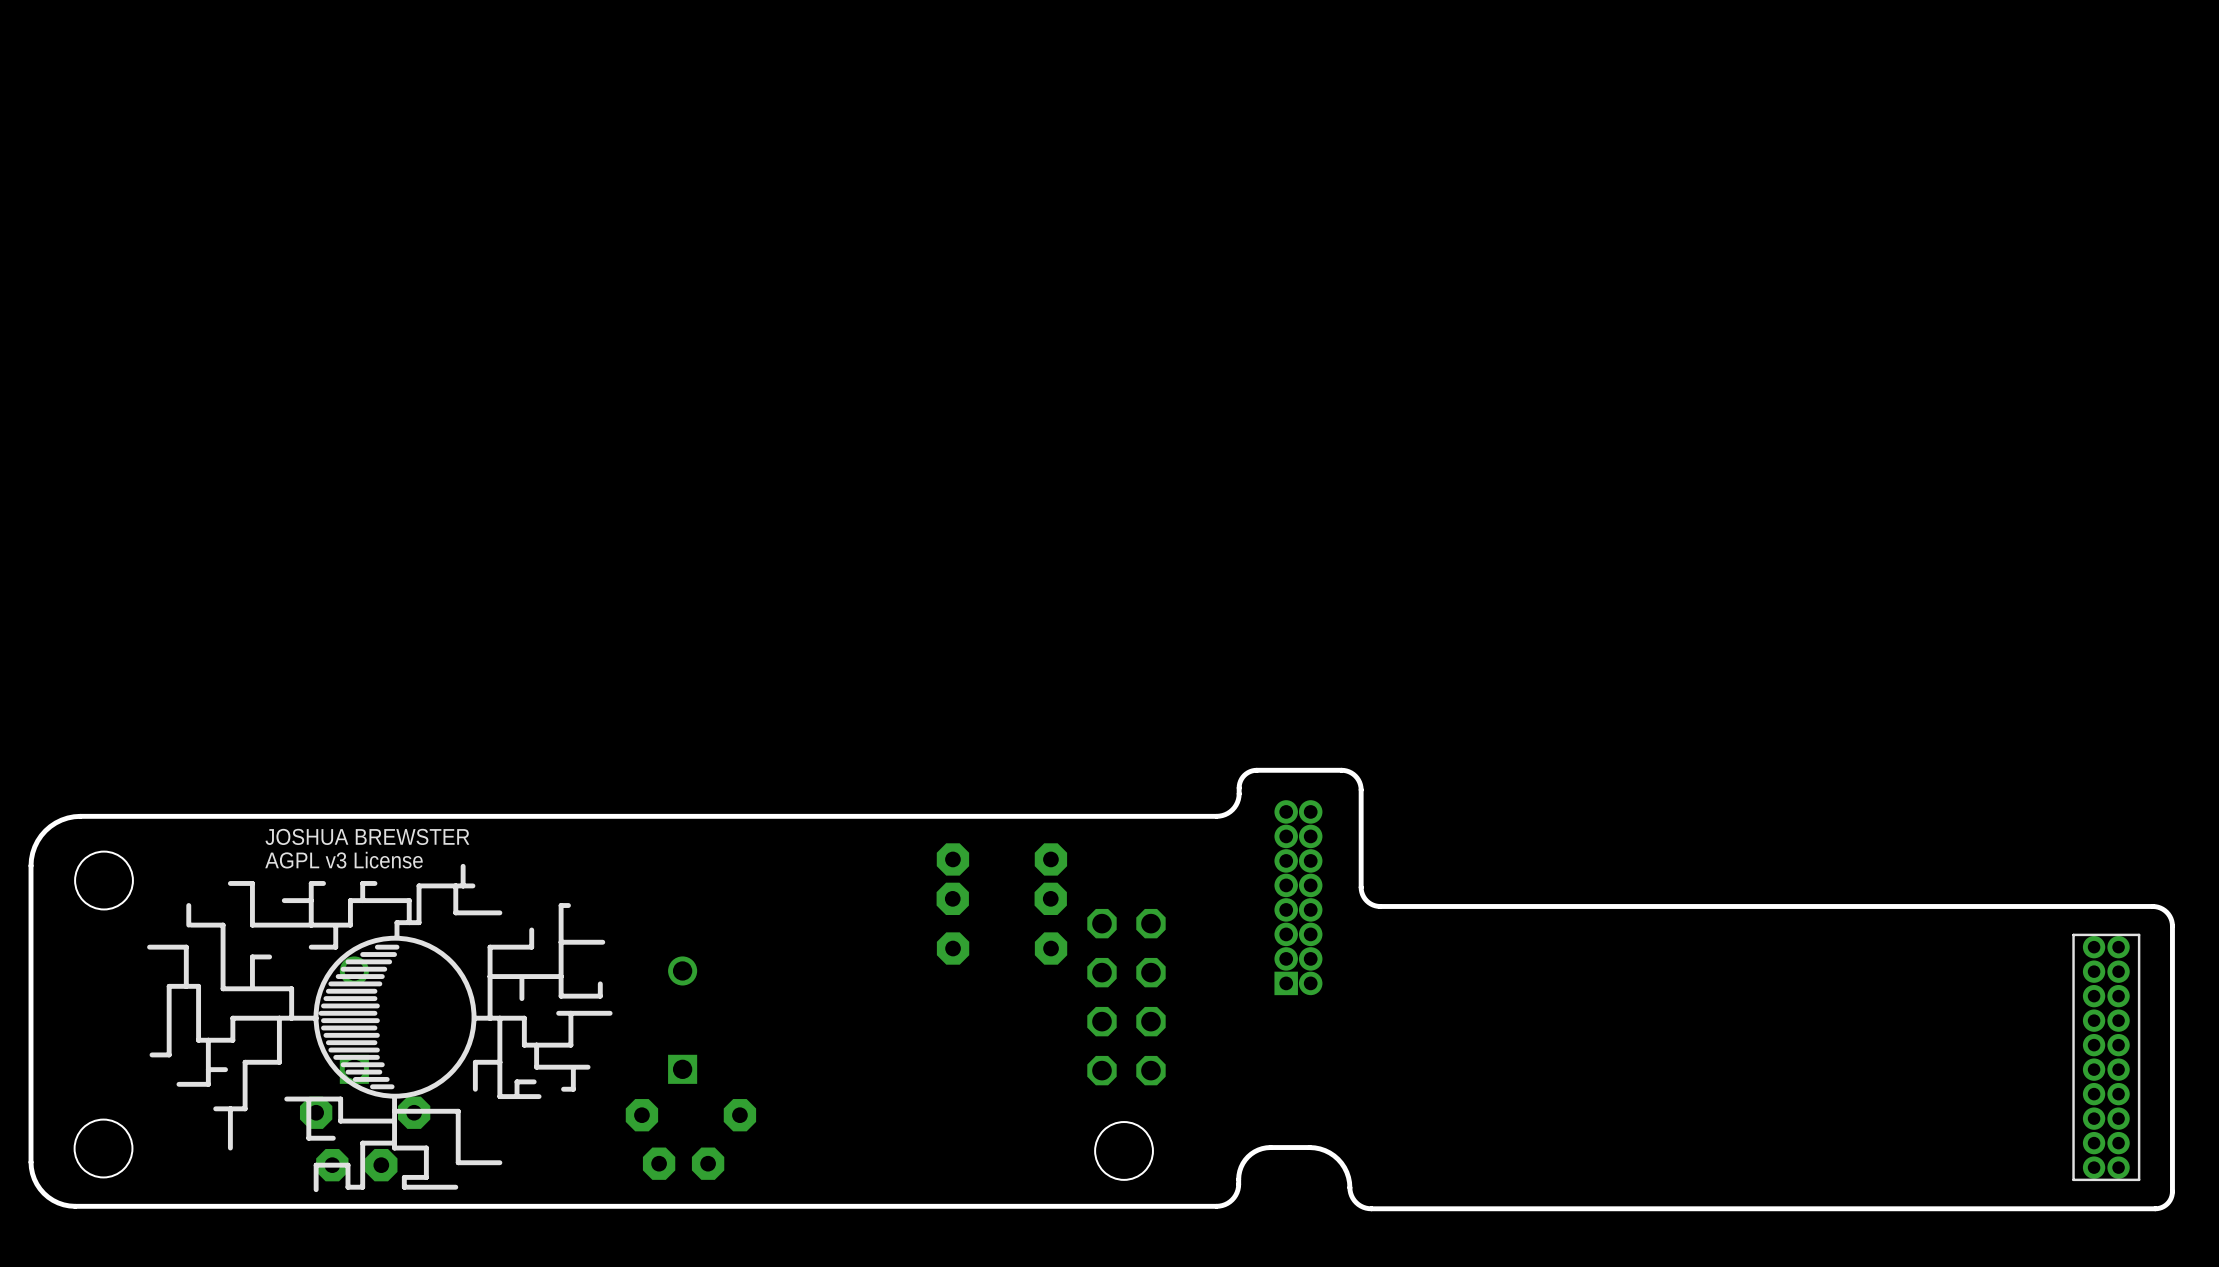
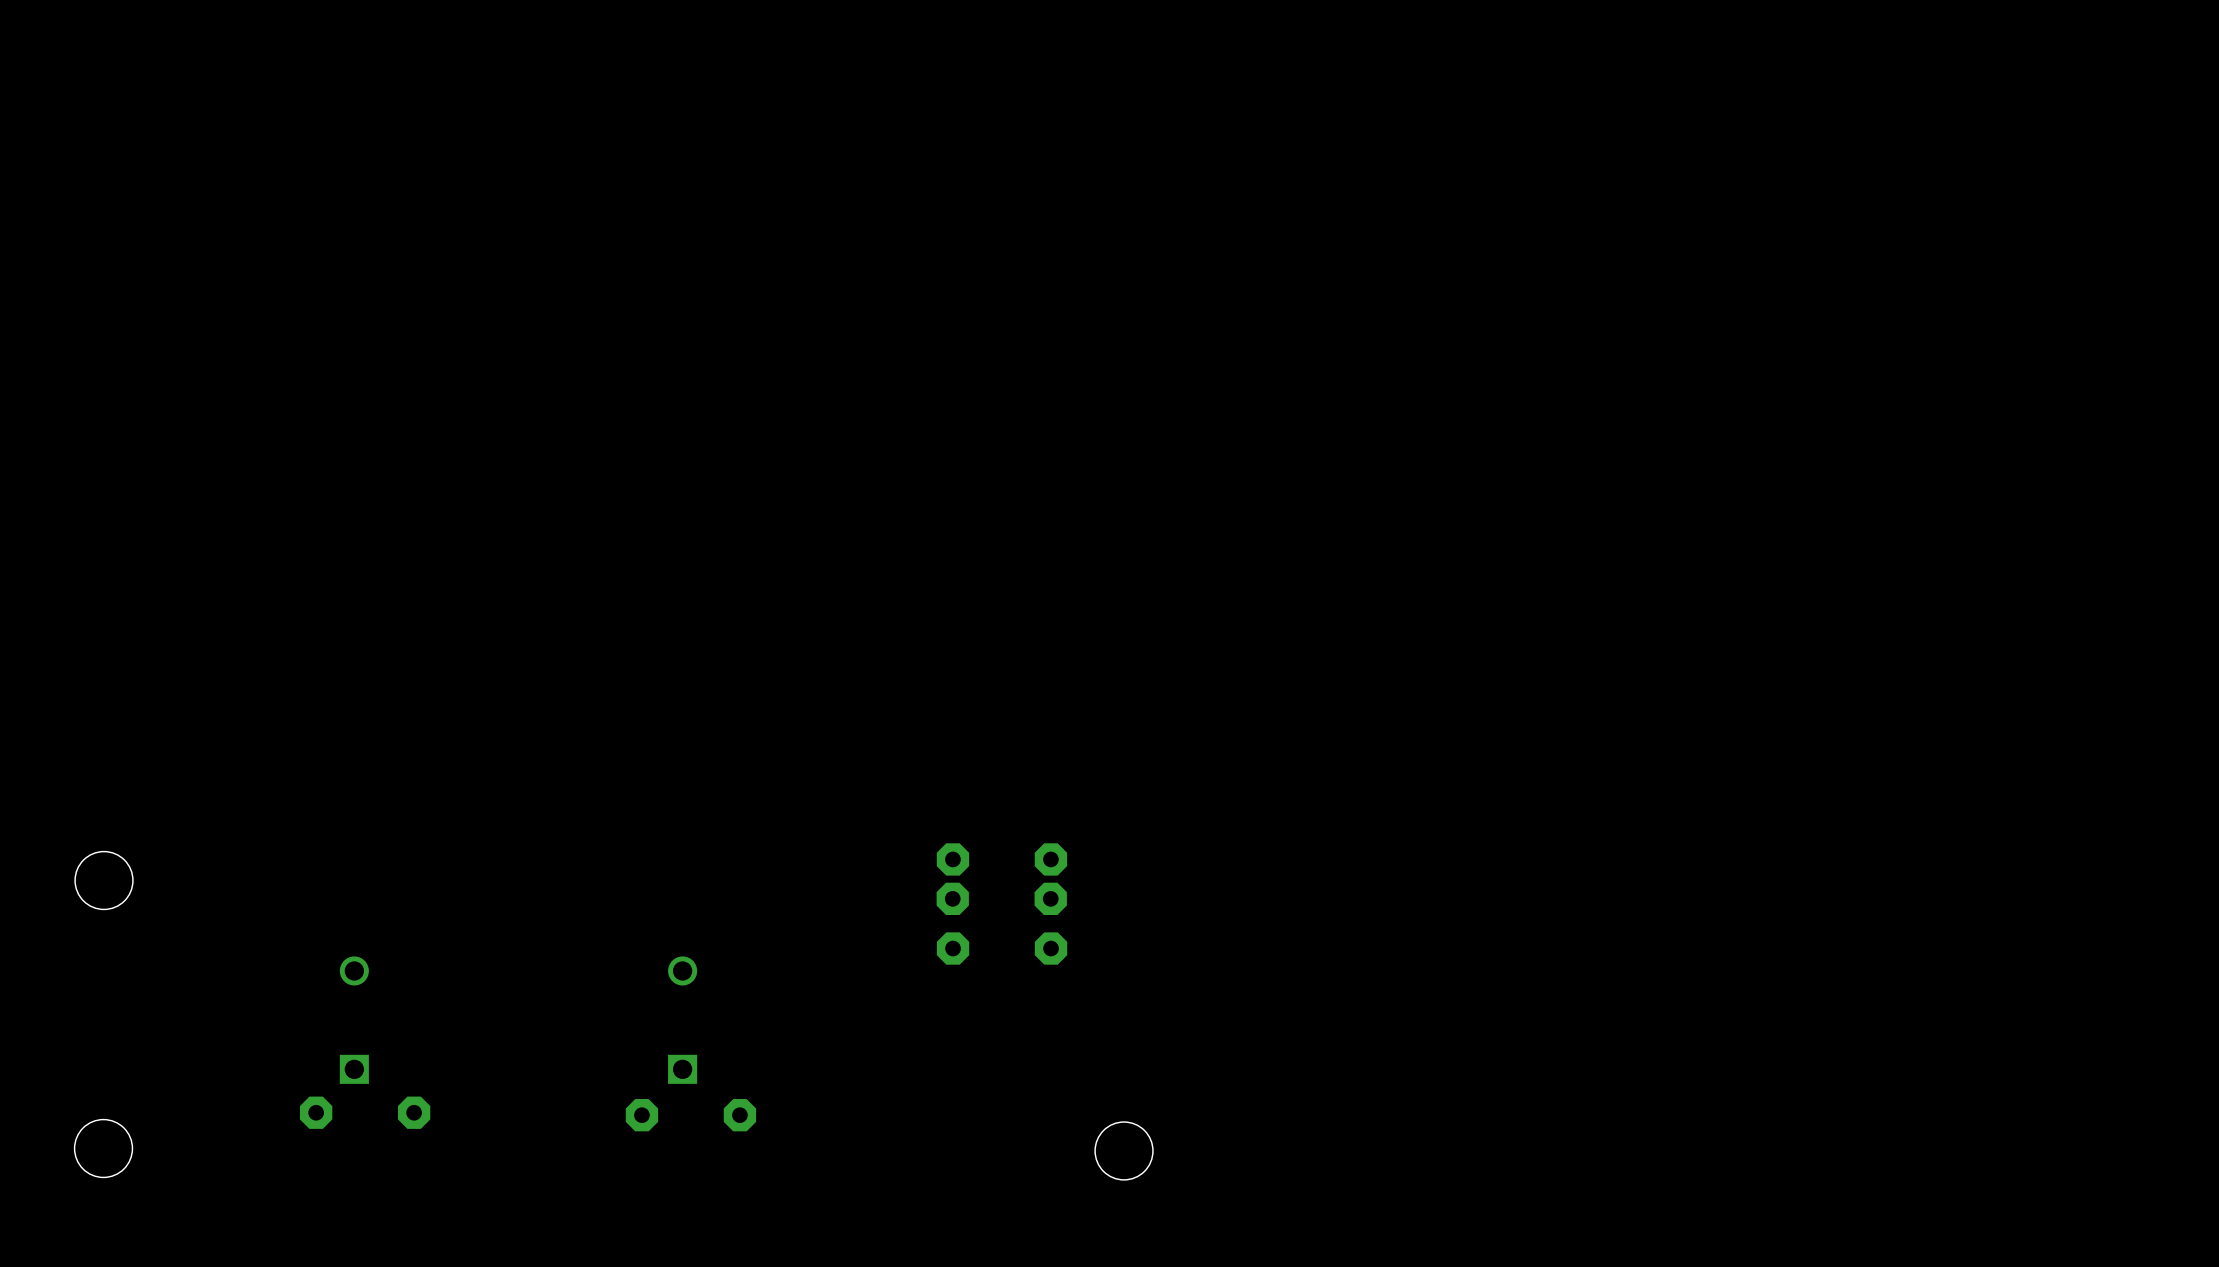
board edge: (1341, 770) (1250, 771) (1240, 781) (1238, 799) (1234, 807) (1227, 813) (1216, 816) (80, 816) (67, 818) (50, 826) (41, 835) (34, 846) (31, 859) (32, 1173) (40, 1189) (48, 1197) (58, 1202) (75, 1206) (1216, 1206) (1227, 1203) (1234, 1197) (1237, 1189) (1241, 1167) (1245, 1159) (1254, 1151) (1266, 1147) (1309, 1147) (1325, 1150) (1338, 1159) (1346, 1172) (1352, 1198) (1360, 1206) (1368, 1208) (2155, 1208) (2163, 1206) (2170, 1200) (2172, 1191) (2172, 926) (2169, 916) (2162, 909) (2152, 906) (1377, 906) (1366, 900) (1361, 889) (1360, 784) (1353, 774) (1341, 770) -> none
text: JOSHUA BREWSTER (367, 836) -> none
text: AGPL v3 License (343, 860) -> none
line: (463, 866) (463, 885) -> none
line: (230, 883) (252, 883) (252, 925) (350, 925) (350, 900) (409, 900) (409, 922) -> none
line: (323, 883) (311, 883) (311, 925) -> none
line: (374, 883) (362, 883) (362, 900) -> none
line: (455, 885) (455, 912) (499, 912) -> none
line: (472, 885) (419, 885) (419, 922) (396, 922) (396, 937) -> none
part: (1298, 897) -> none
line: (311, 900) (284, 900) -> none
line: (188, 905) (188, 925) -> none
line: (568, 905) (561, 905) (561, 996) (600, 996) (600, 983) -> none
line: (191, 925) (223, 925) (223, 988) (291, 988) (291, 1018) -> none
line: (335, 927) (335, 947) (311, 947) -> none
line: (531, 930) (531, 947) (490, 947) (490, 1018) -> none
drawing: [313, 935, 477, 1099] -> none
line: (602, 942) (561, 942) -> none
line: (149, 947) (186, 947) (186, 986) -> none
line: (396, 947) (377, 947) -> none
line: (394, 954) (362, 954) -> none
line: (269, 956) (252, 956) (252, 986) -> none
line: (389, 961) (347, 961) -> none
line: (384, 969) (343, 969) -> none
line: (382, 976) (338, 976) -> none
line: (561, 976) (490, 976) -> none
line: (521, 979) (521, 998) -> none
line: (379, 983) (330, 983) -> none
line: (374, 991) (328, 991) -> none
part: (1126, 997) -> none
line: (374, 998) (325, 998) -> none
line: (377, 1005) (323, 1005) -> none
line: (374, 1013) (321, 1013) -> none
line: (570, 1013) (570, 1045) (524, 1045) (524, 1018) (475, 1018) -> none
line: (610, 1013) (558, 1013) -> none
line: (279, 1018) (279, 1062) (245, 1062) (245, 1108) (215, 1108) -> none
line: (316, 1018) (232, 1018) (232, 1040) (198, 1040) (198, 986) (169, 986) (169, 1054) (152, 1054) -> none
line: (499, 1018) (499, 1096) (539, 1096) -> none
line: (377, 1020) (323, 1020) -> none
line: (374, 1027) (323, 1027) -> none
line: (377, 1035) (325, 1035) -> none
line: (208, 1040) (208, 1084) (178, 1084) -> none
line: (374, 1042) (328, 1042) -> none
line: (536, 1045) (536, 1067) (588, 1067) -> none
line: (377, 1050) (330, 1050) -> none
line: (377, 1057) (335, 1057) -> none
part: (2106, 1057) -> none
line: (499, 1062) (475, 1062) (475, 1089) -> none
line: (382, 1064) (343, 1064) -> none
line: (225, 1069) (208, 1069) -> none
line: (573, 1069) (573, 1089) (563, 1089) -> none
line: (379, 1072) (347, 1072) -> none
line: (387, 1079) (355, 1079) -> none
line: (534, 1081) (517, 1081) (517, 1094) -> none
line: (392, 1086) (372, 1086) -> none
line: (394, 1096) (394, 1148) (426, 1148) (426, 1177) (404, 1177) (404, 1187) (455, 1187) -> none
line: (286, 1099) (340, 1099) (340, 1121) (394, 1121) -> none
line: (308, 1101) (308, 1138) (333, 1138) -> none
line: (230, 1108) (230, 1148) -> none
line: (394, 1111) (458, 1111) (458, 1162) (499, 1162) -> none
line: (394, 1143) (362, 1143) (362, 1187) (347, 1187) (347, 1165) (316, 1165) (316, 1189) -> none
part: (683, 1163) -> none
part: (356, 1165) -> none

